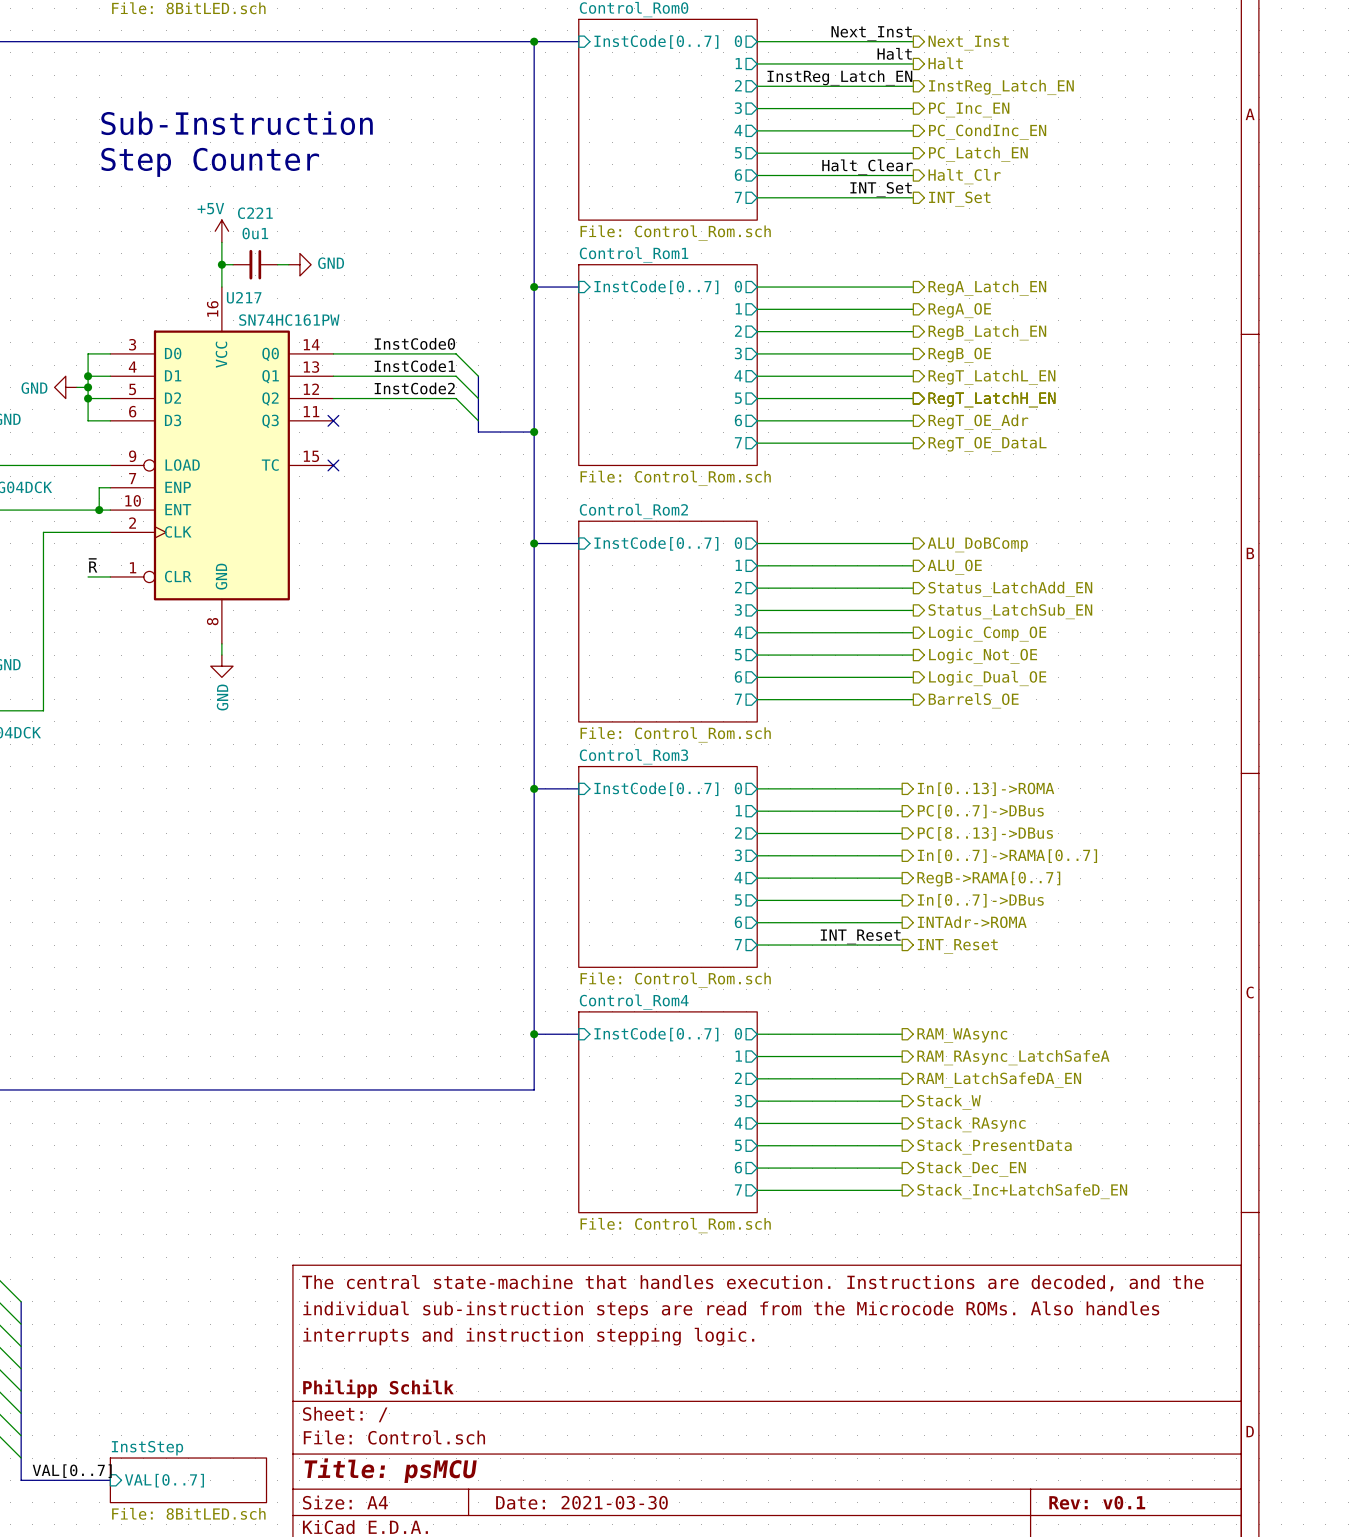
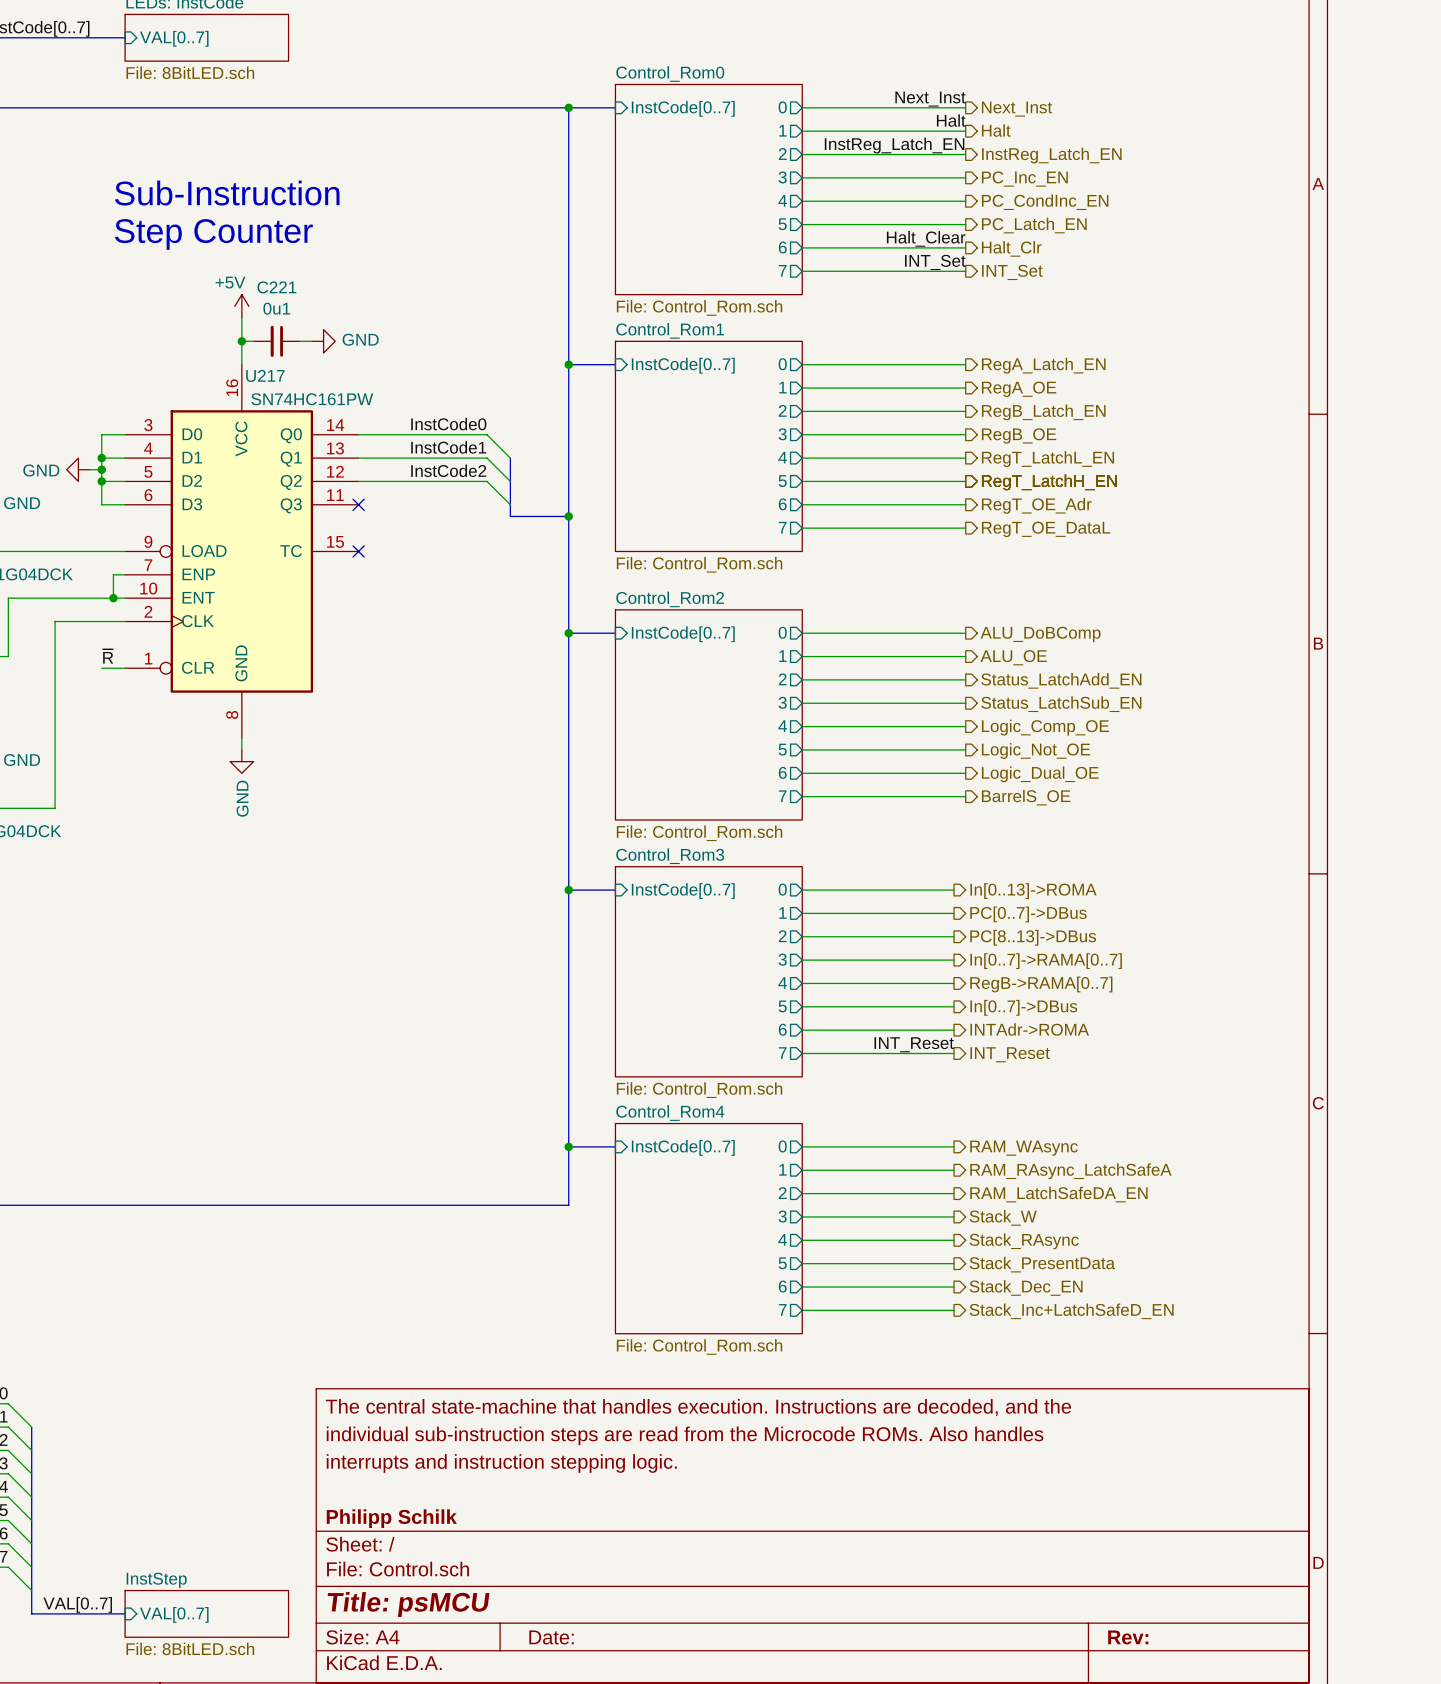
title block: Date: 2021-03-30 (581, 1502) -> Date: (551, 1637)
title block: Rev: v0.1 (1097, 1502) -> Rev: (1128, 1637)

